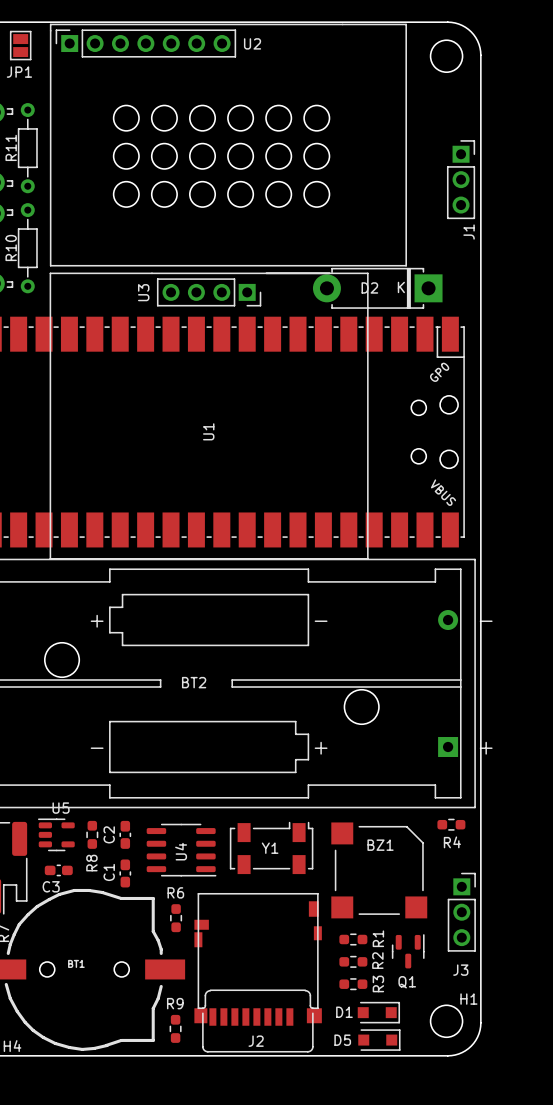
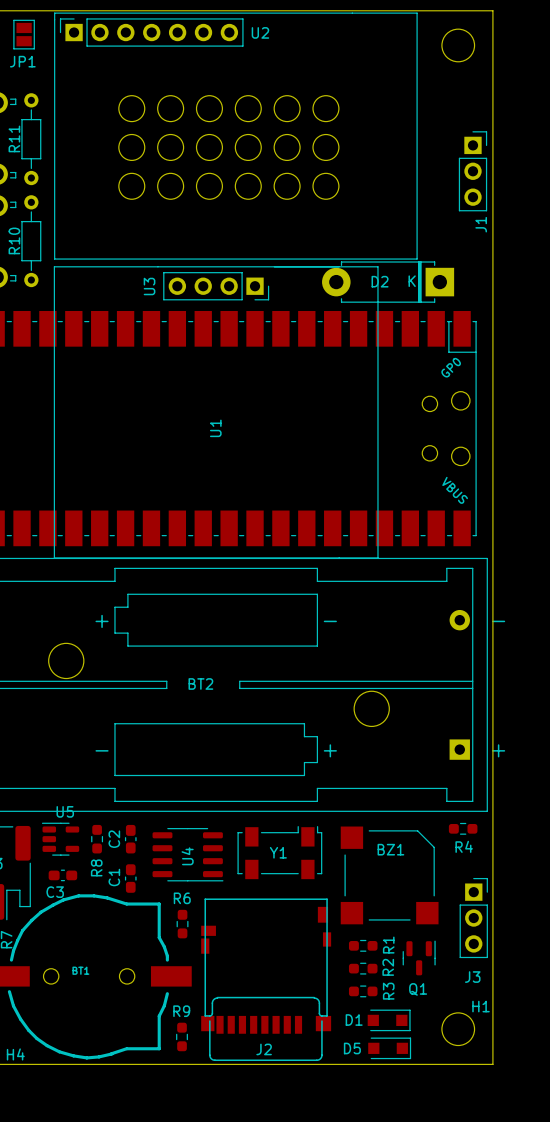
board edge: (447, 22) (458, 24) (471, 31) (477, 40) (480, 55) (480, 1022) (479, 1033) (471, 1046) (462, 1052) (447, 1055) -> (459, 10) (492, 10) (492, 1064) (459, 1064)

